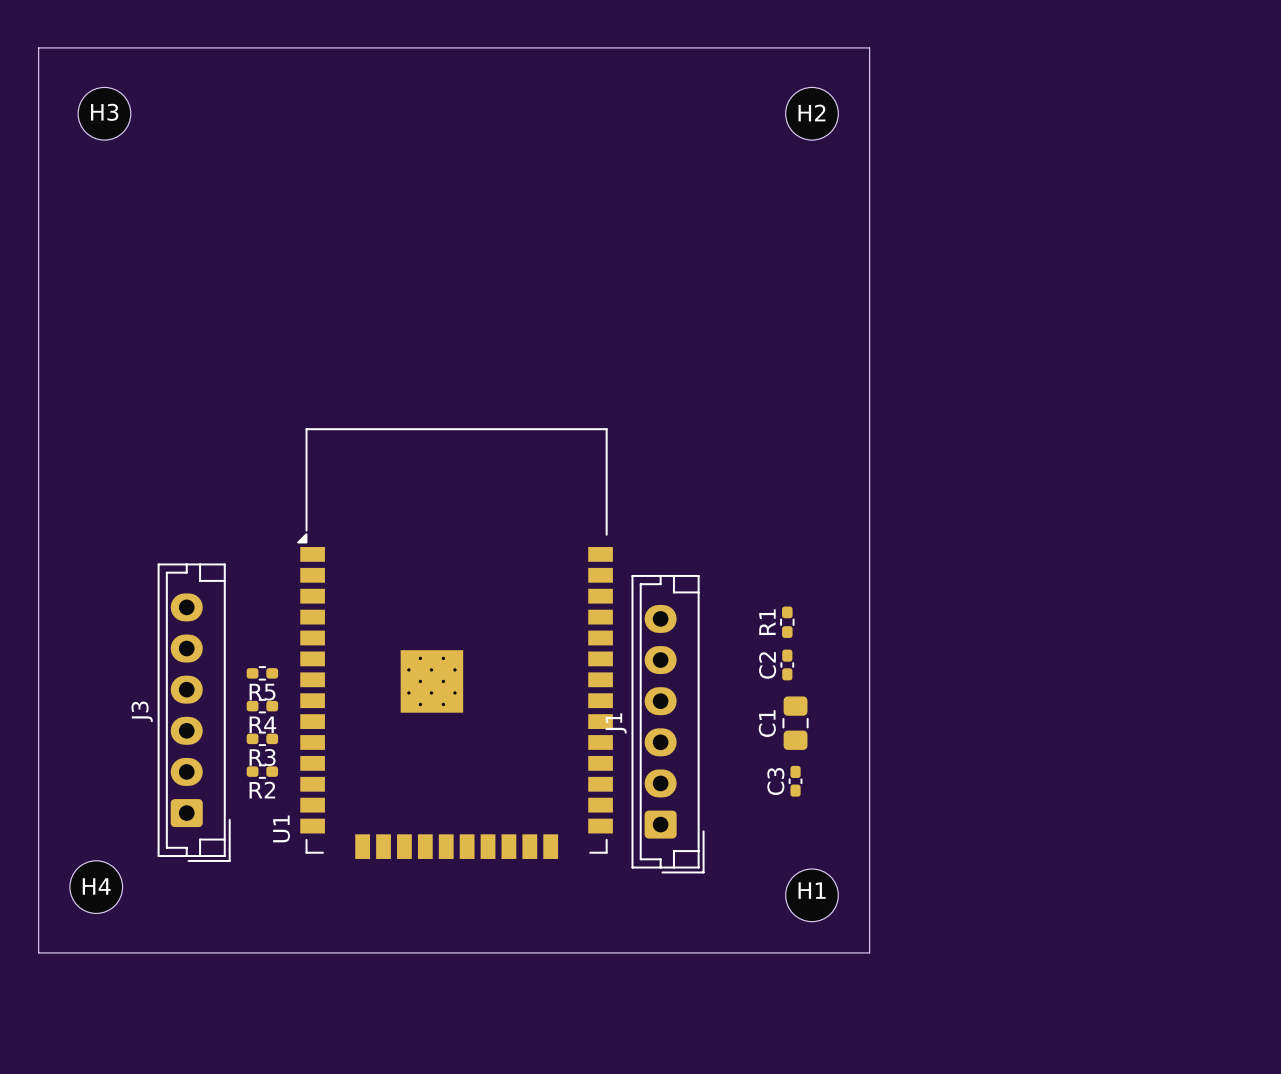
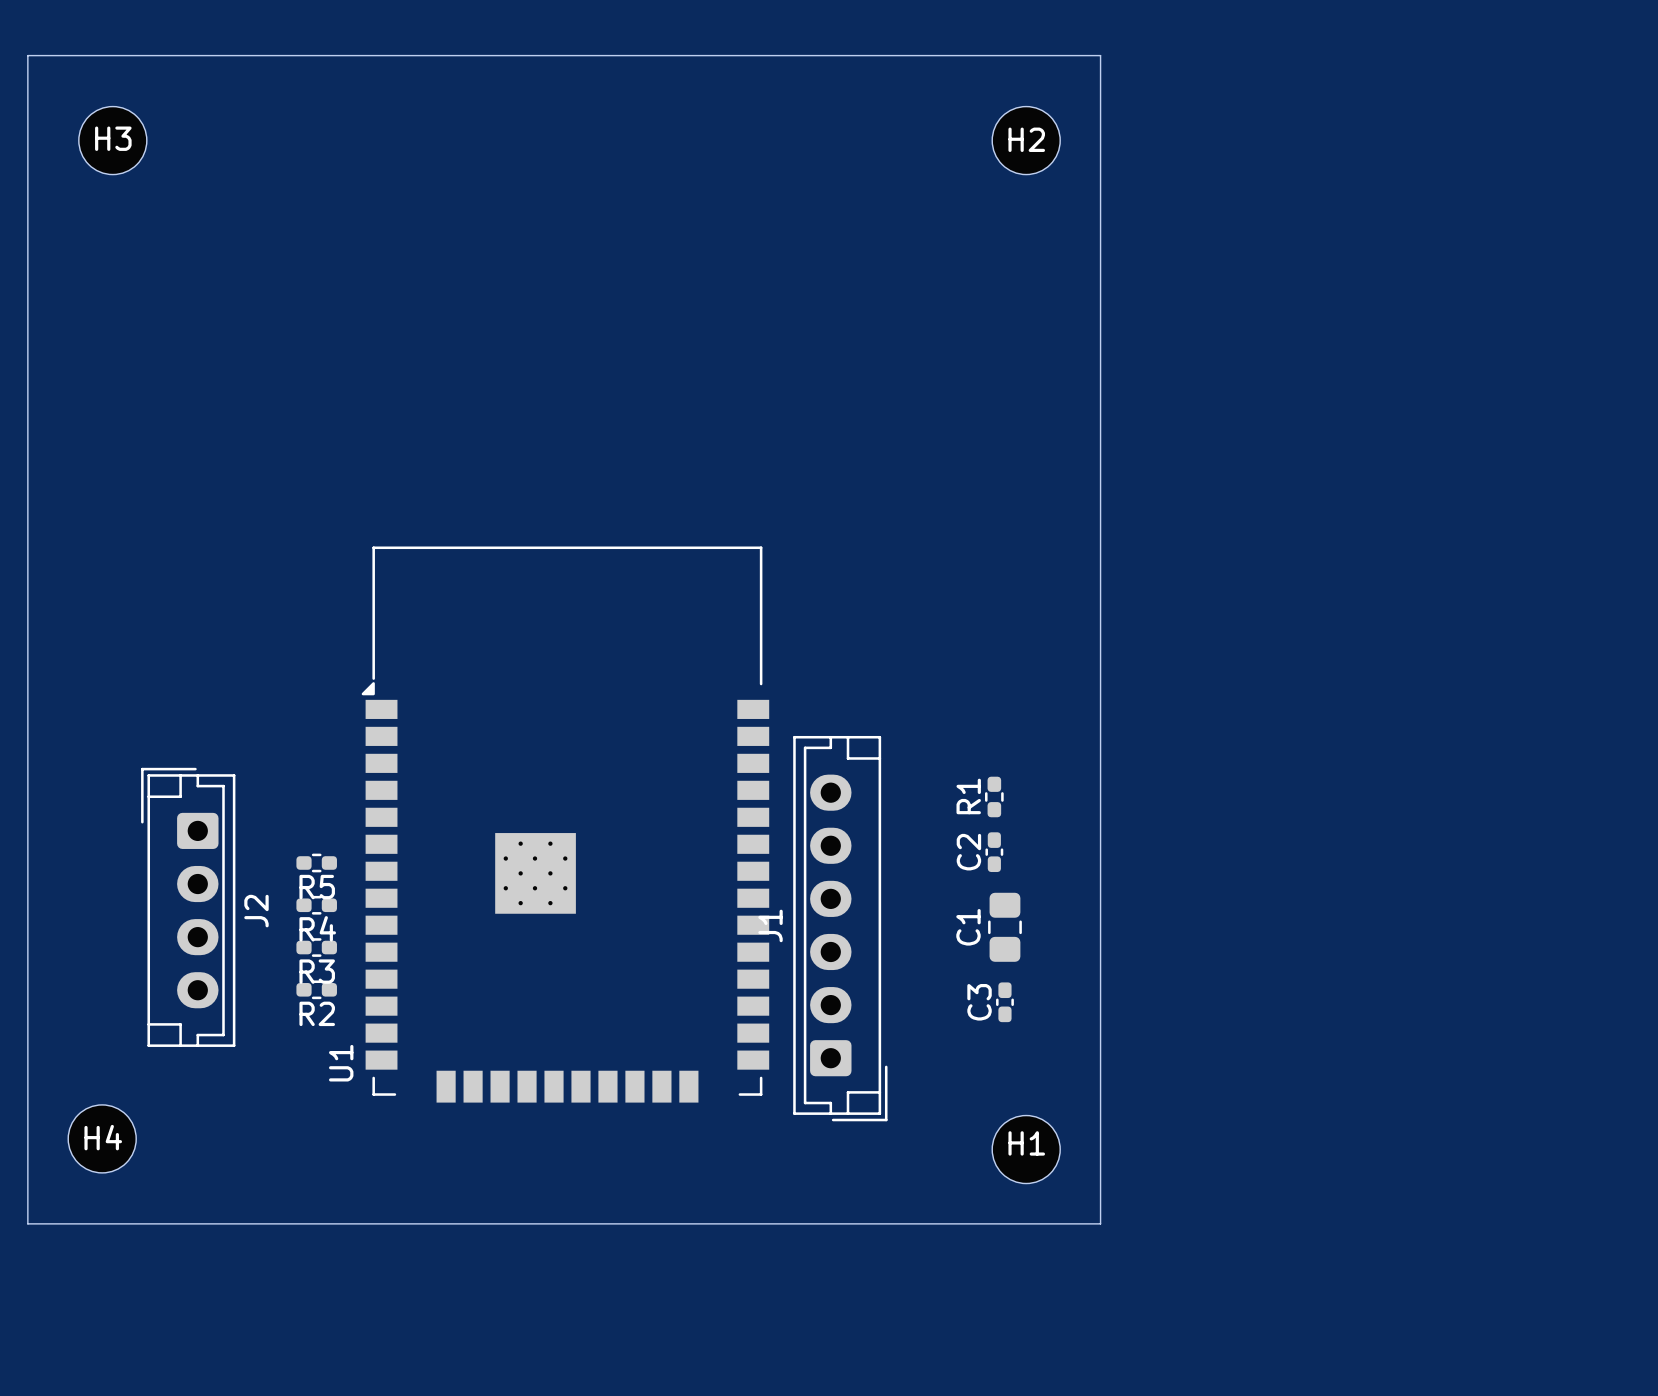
J2: none -> (188, 907)
J3: (194, 712) -> none

